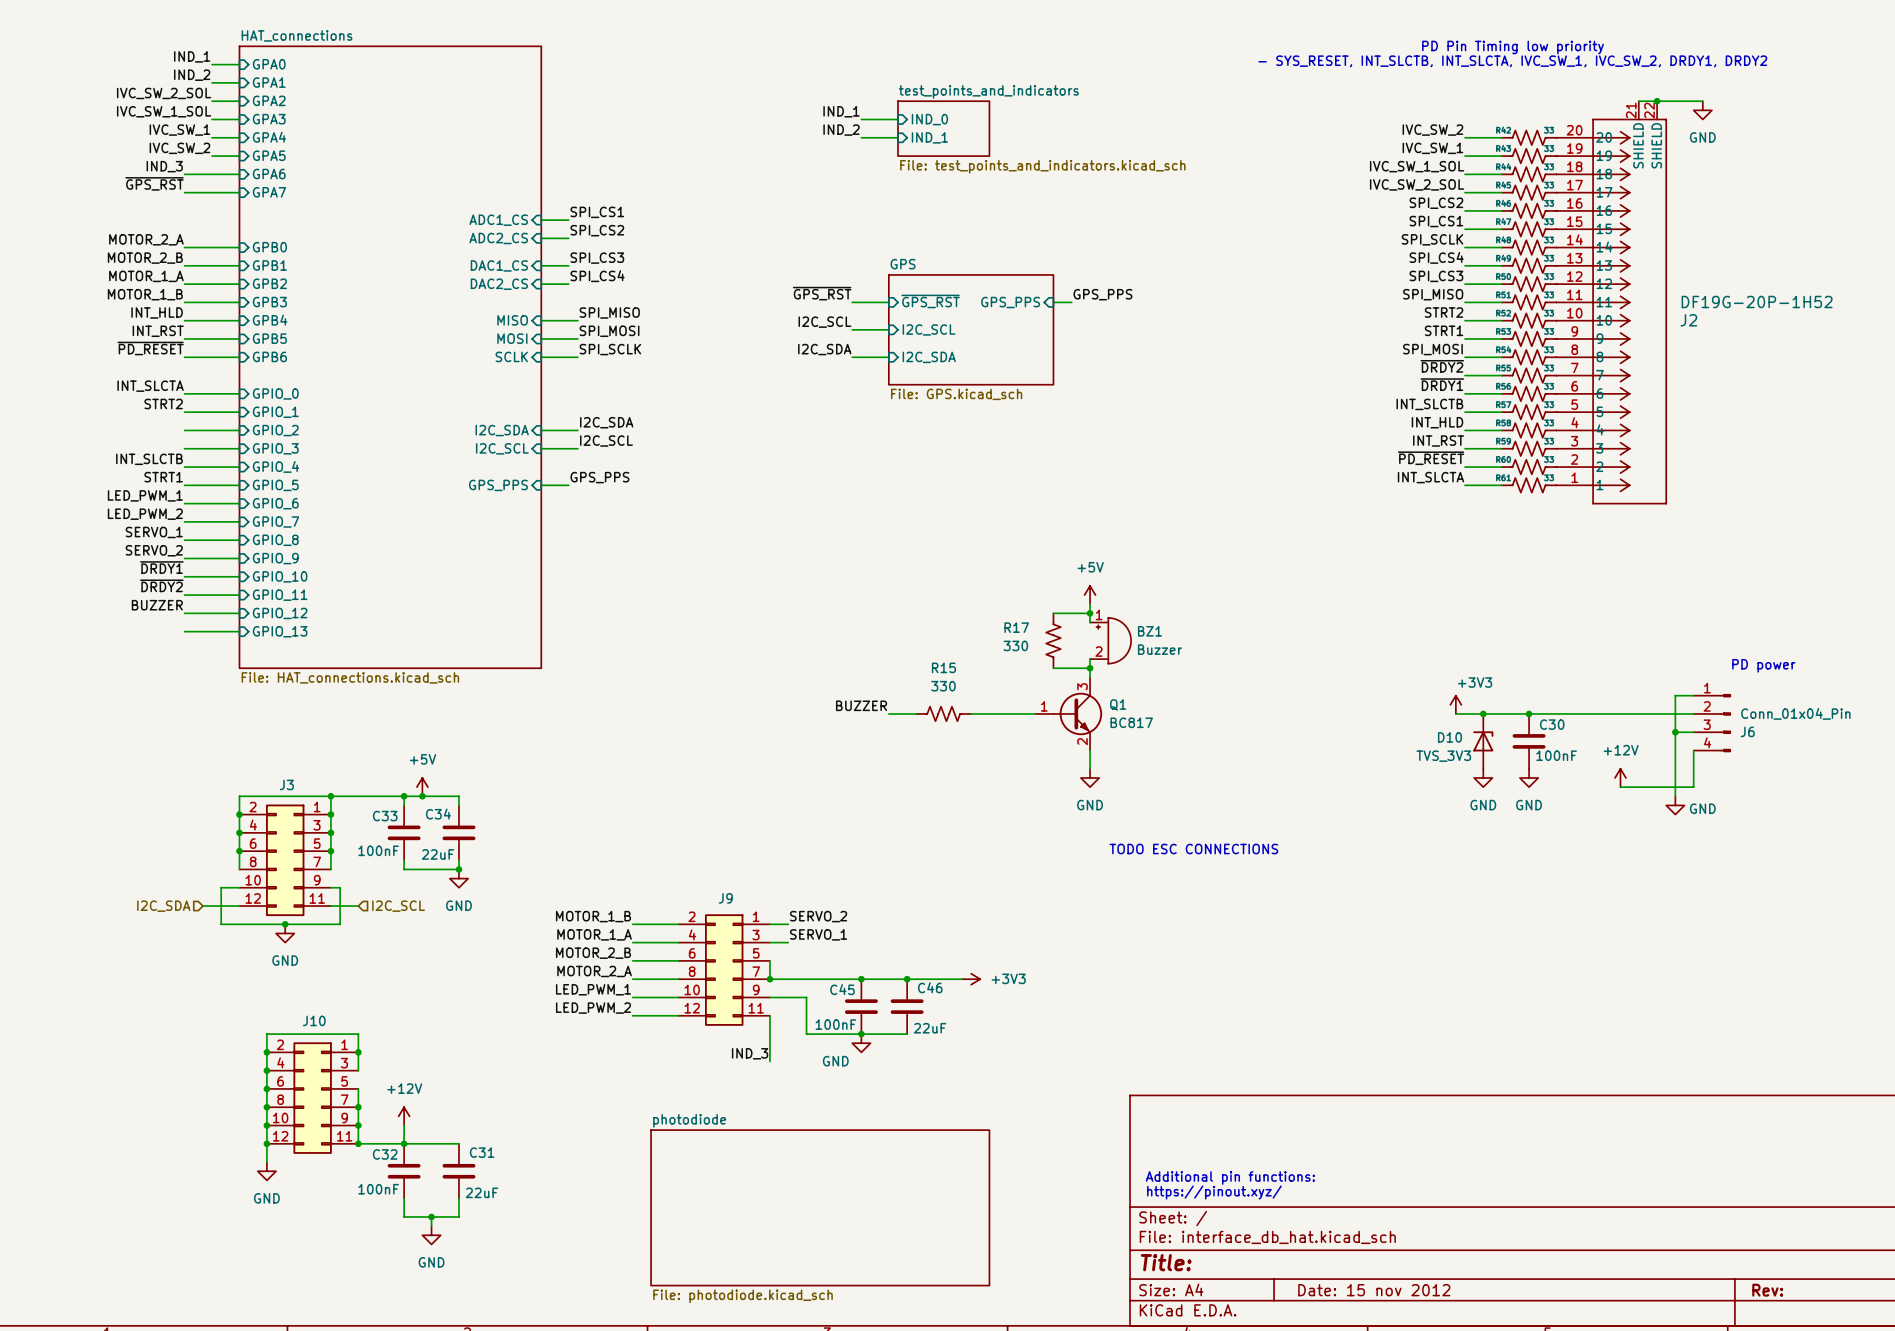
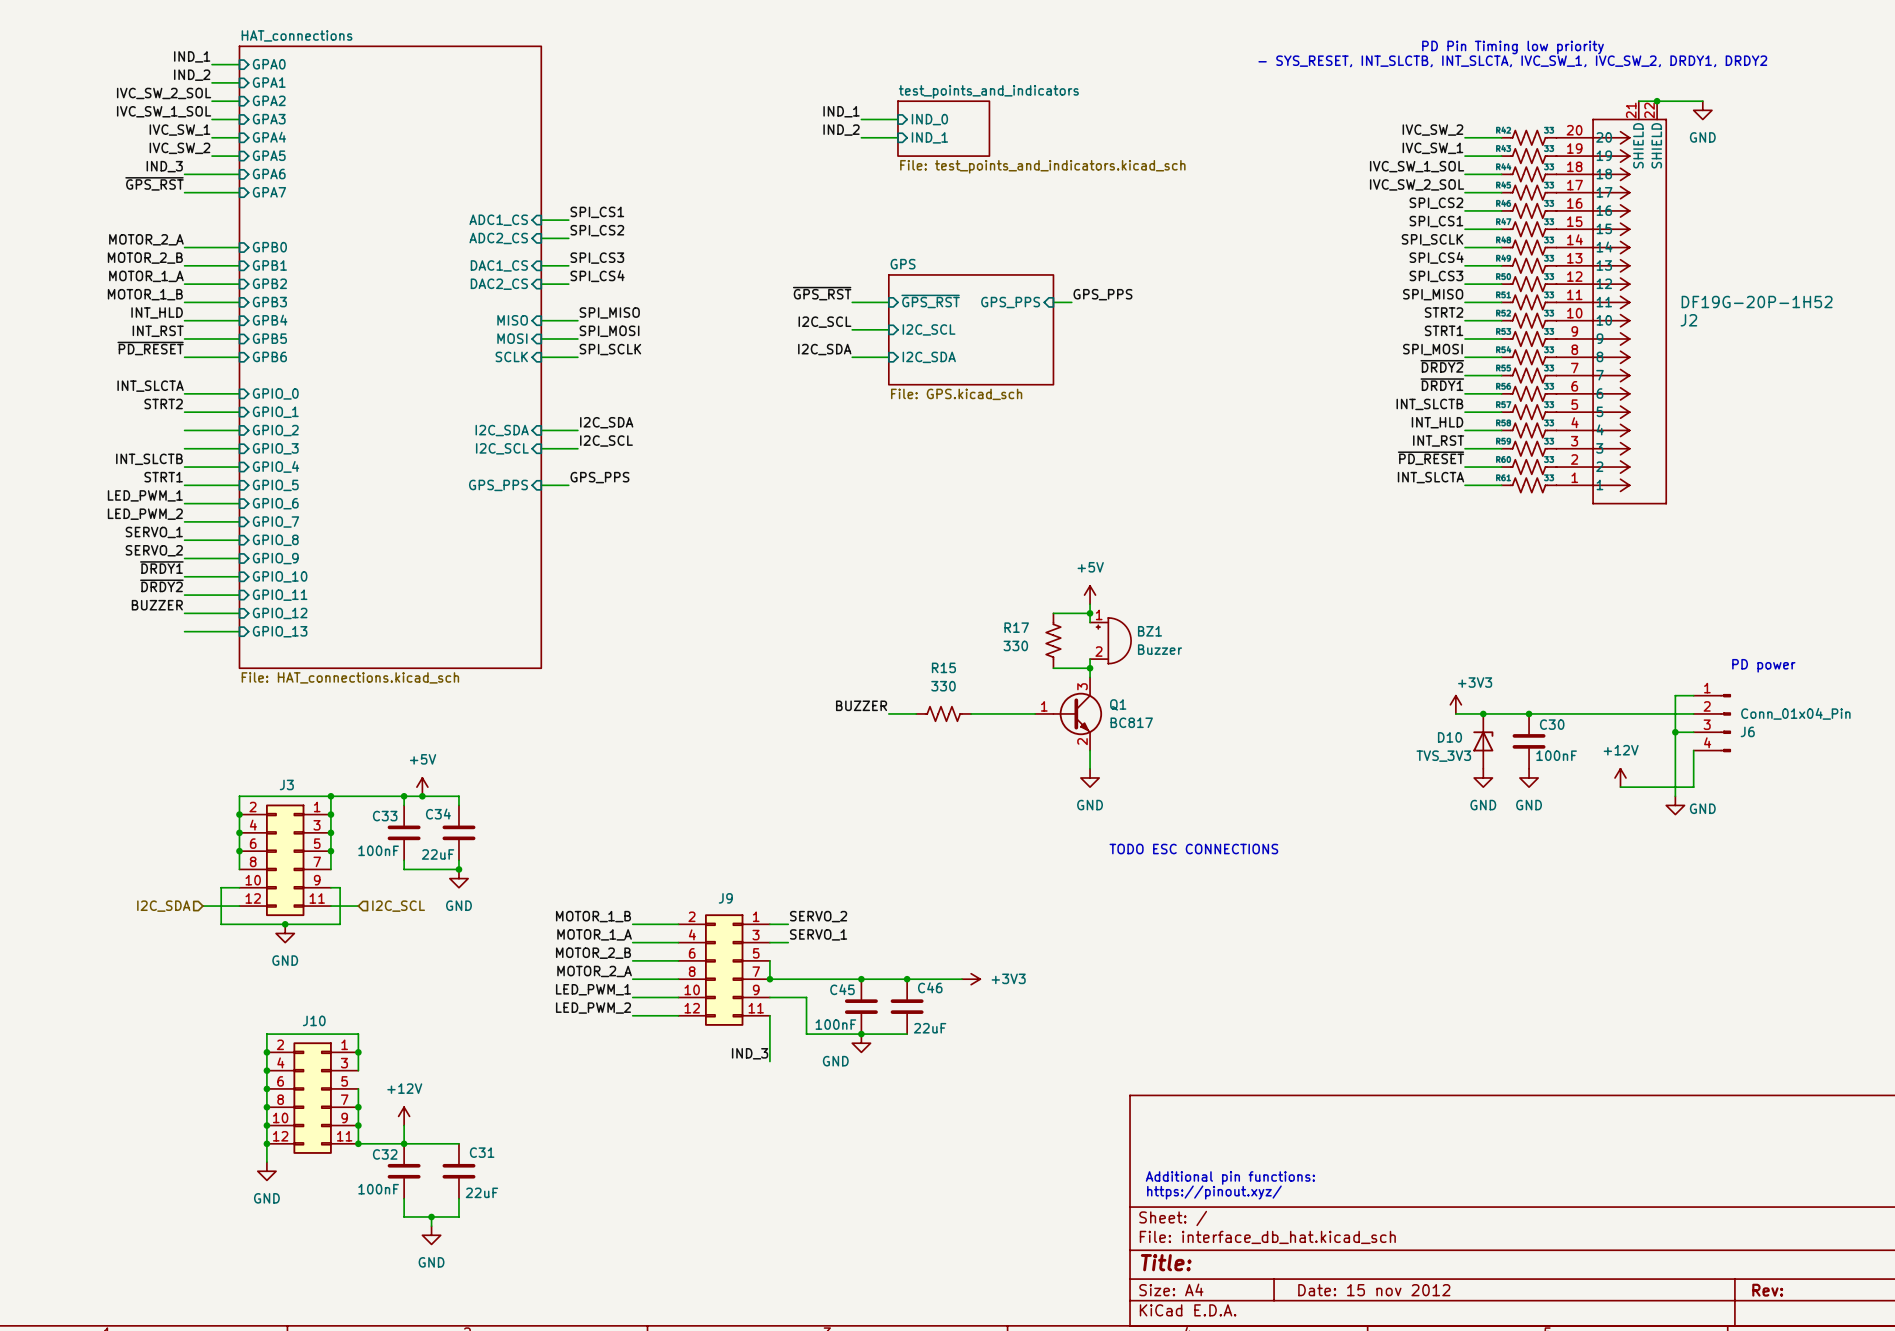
sheet photodiode: File: photodiode.kicad_sch (820, 1207) -> none

